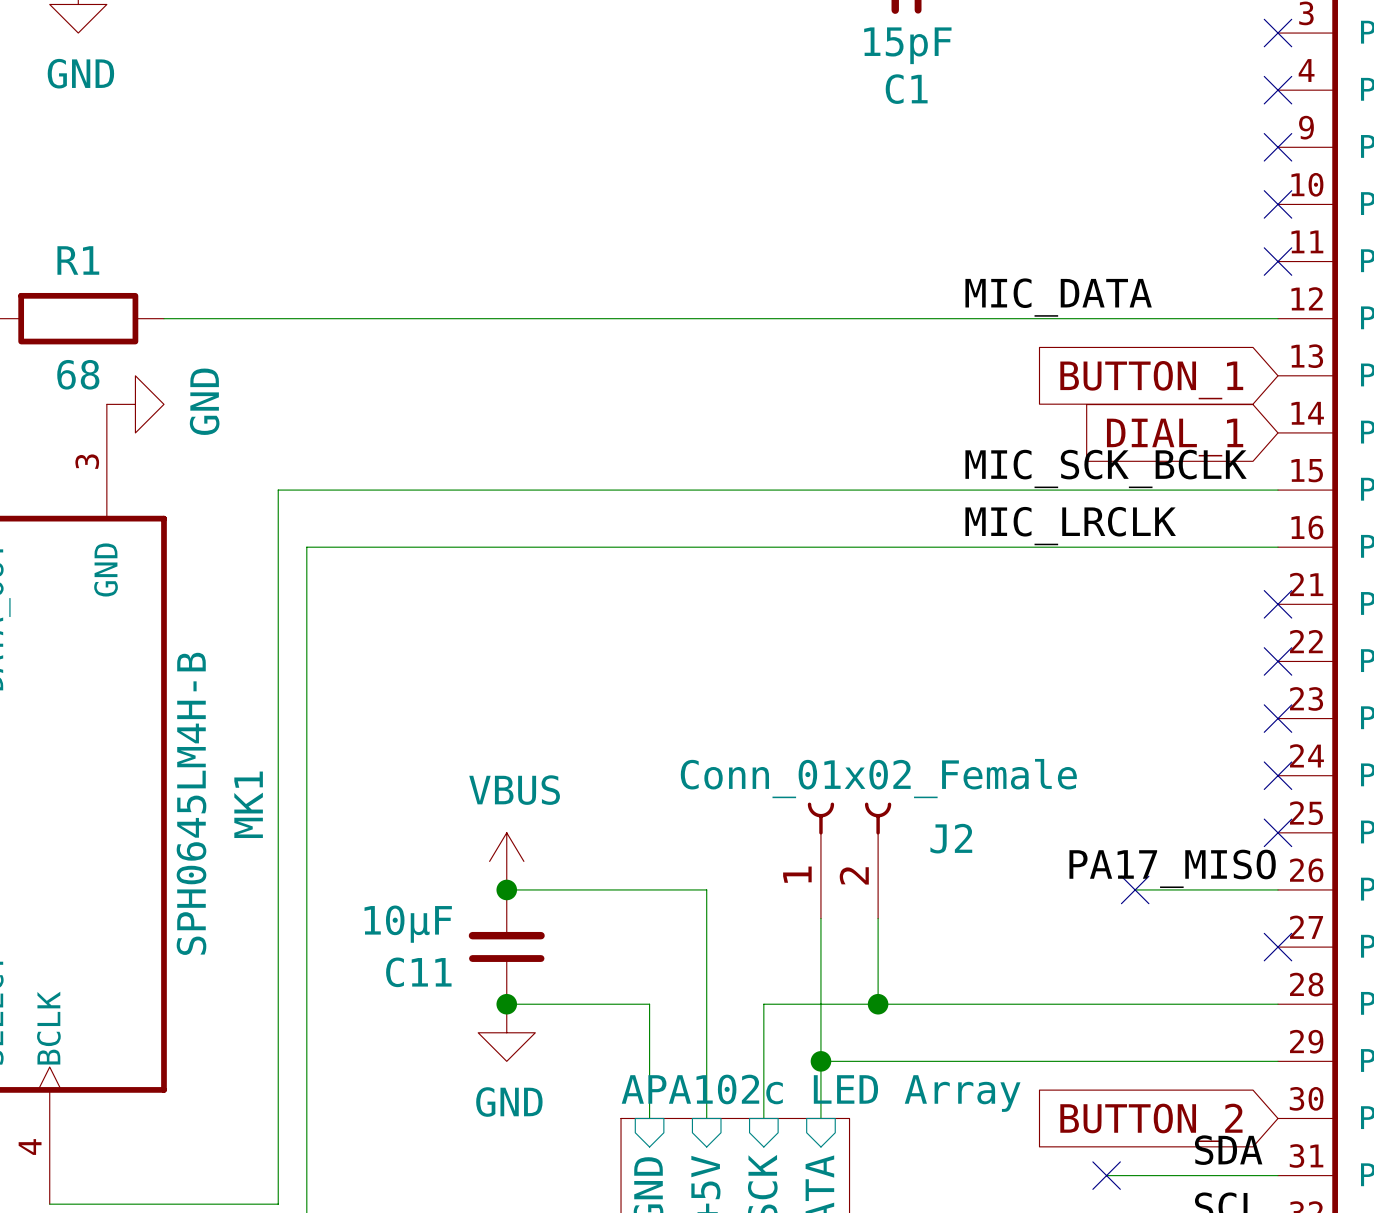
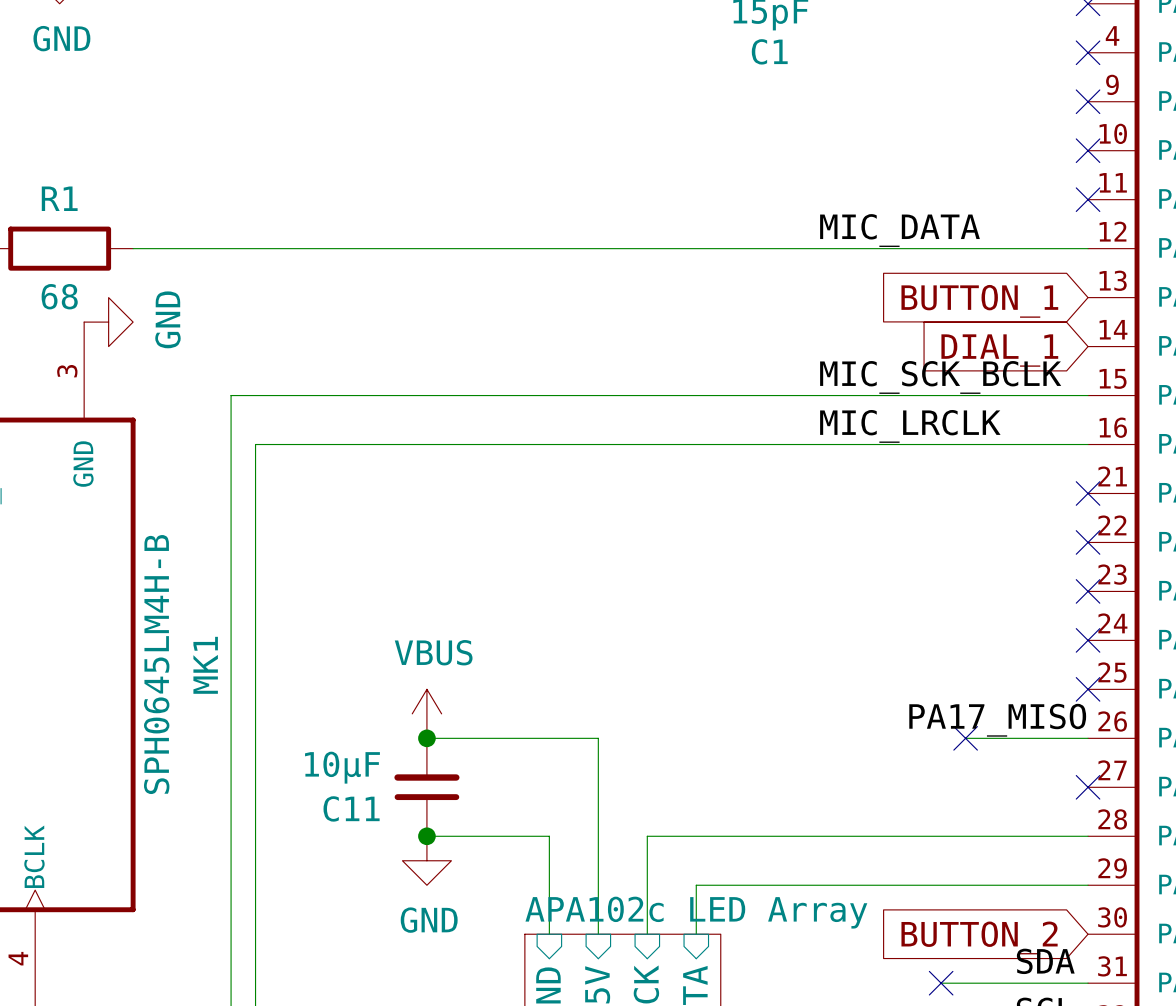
J2: Conn_01x02_Female (849, 860) -> none
wire: (820, 918) (820, 1061) -> none
wire: (878, 918) (878, 1004) -> none
junction: (878, 1004) -> none
junction: (820, 1061) -> none

